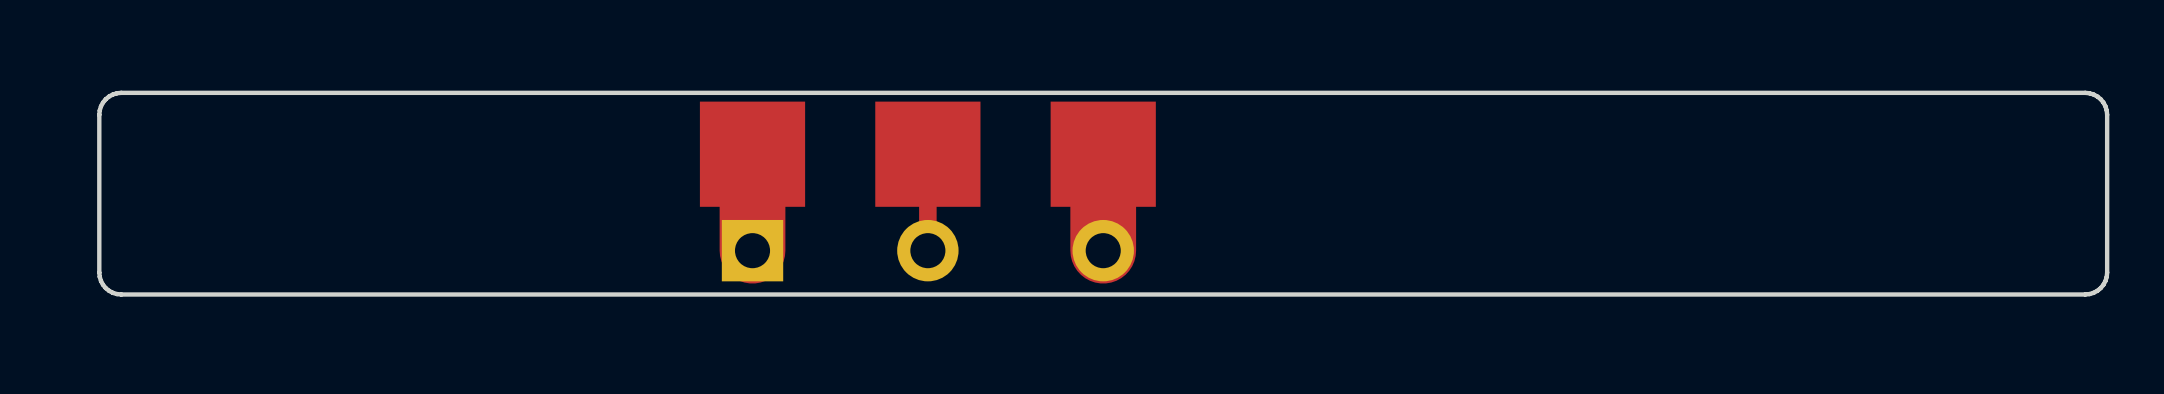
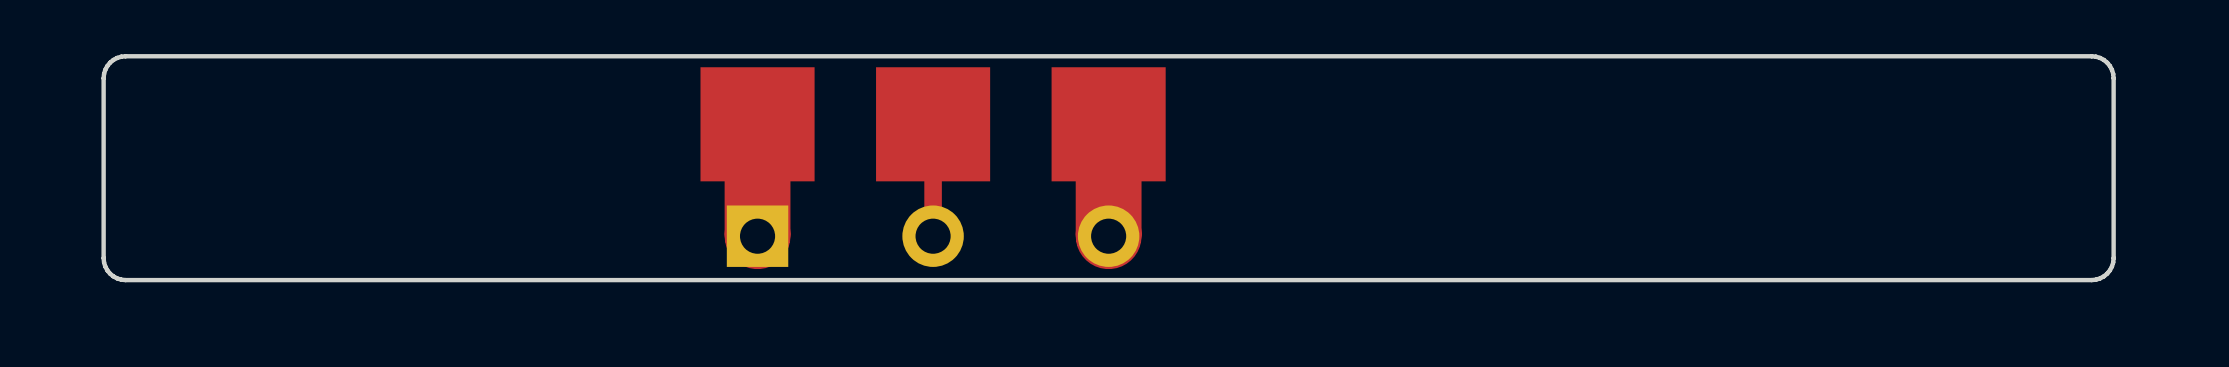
part footprint: [699, 101, 1156, 207] -> [700, 67, 1166, 182]
board edge: (99, 114) (100, 106) (105, 99) (112, 94) (121, 92) (2085, 92) (2093, 94) (2100, 99) (2105, 106) (2107, 114) -> (103, 100) (105, 69) (113, 59) (125, 56) (2091, 56) (2103, 59) (2111, 69) (2113, 100)

